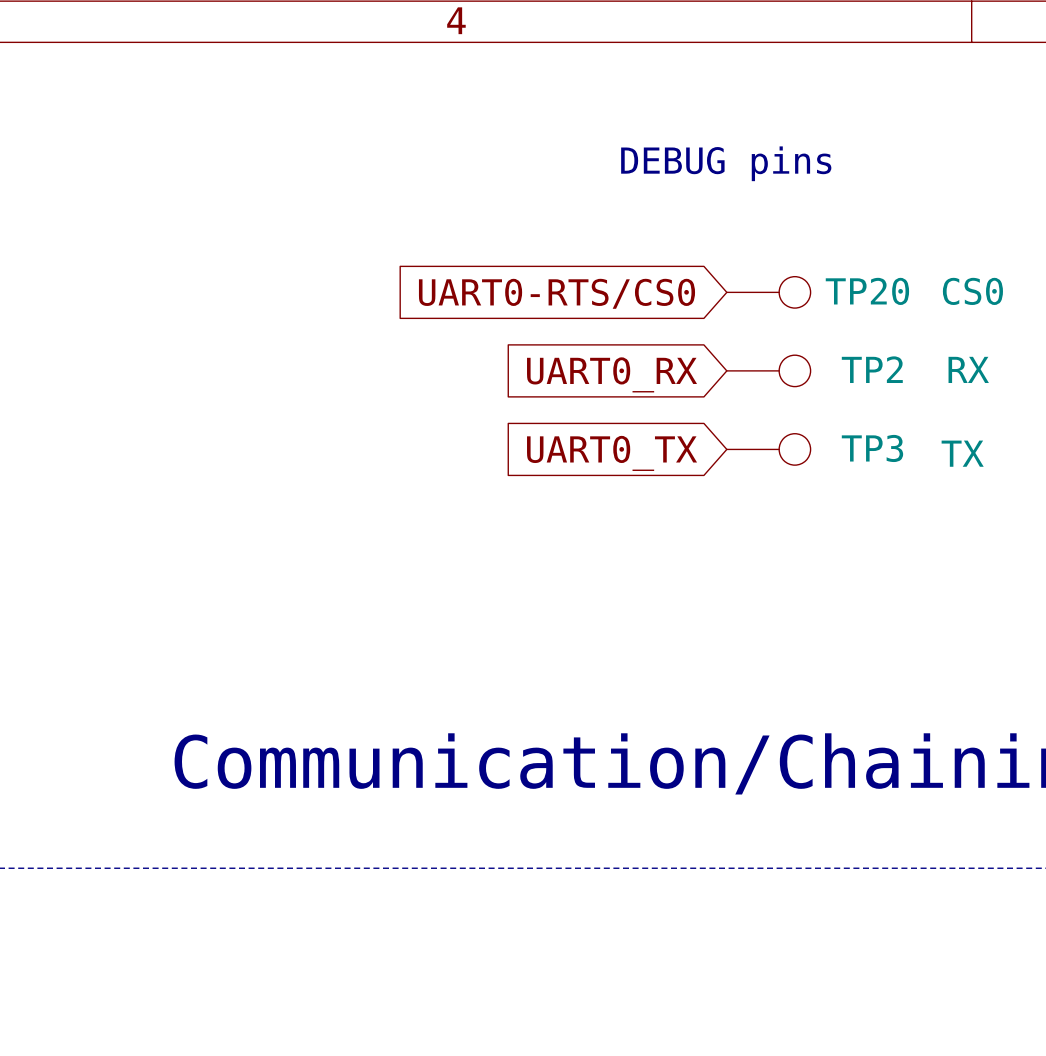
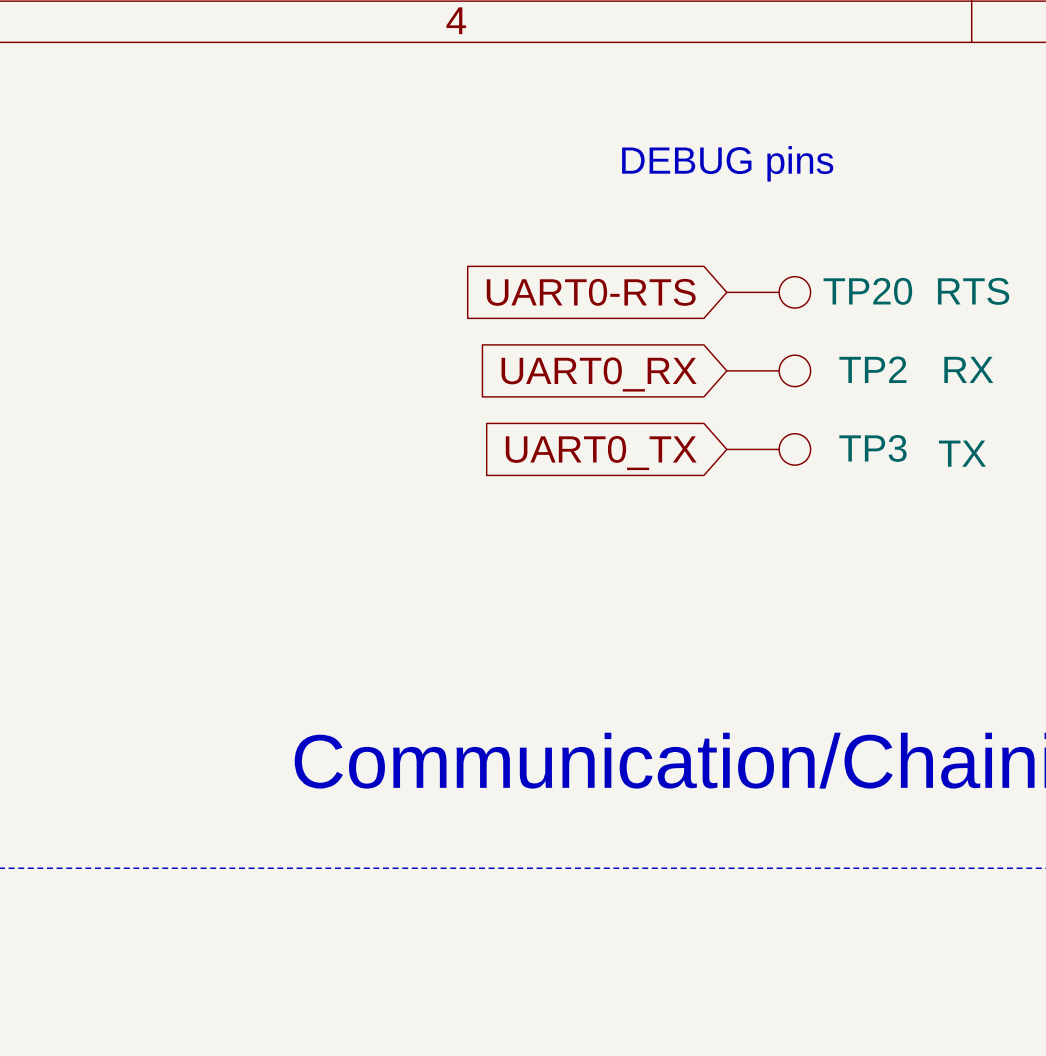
TP20 value: CS0 (972, 291) -> RTS (973, 291)
global label: UART0-RTS/CS0 (556, 293) -> UART0-RTS (591, 292)

